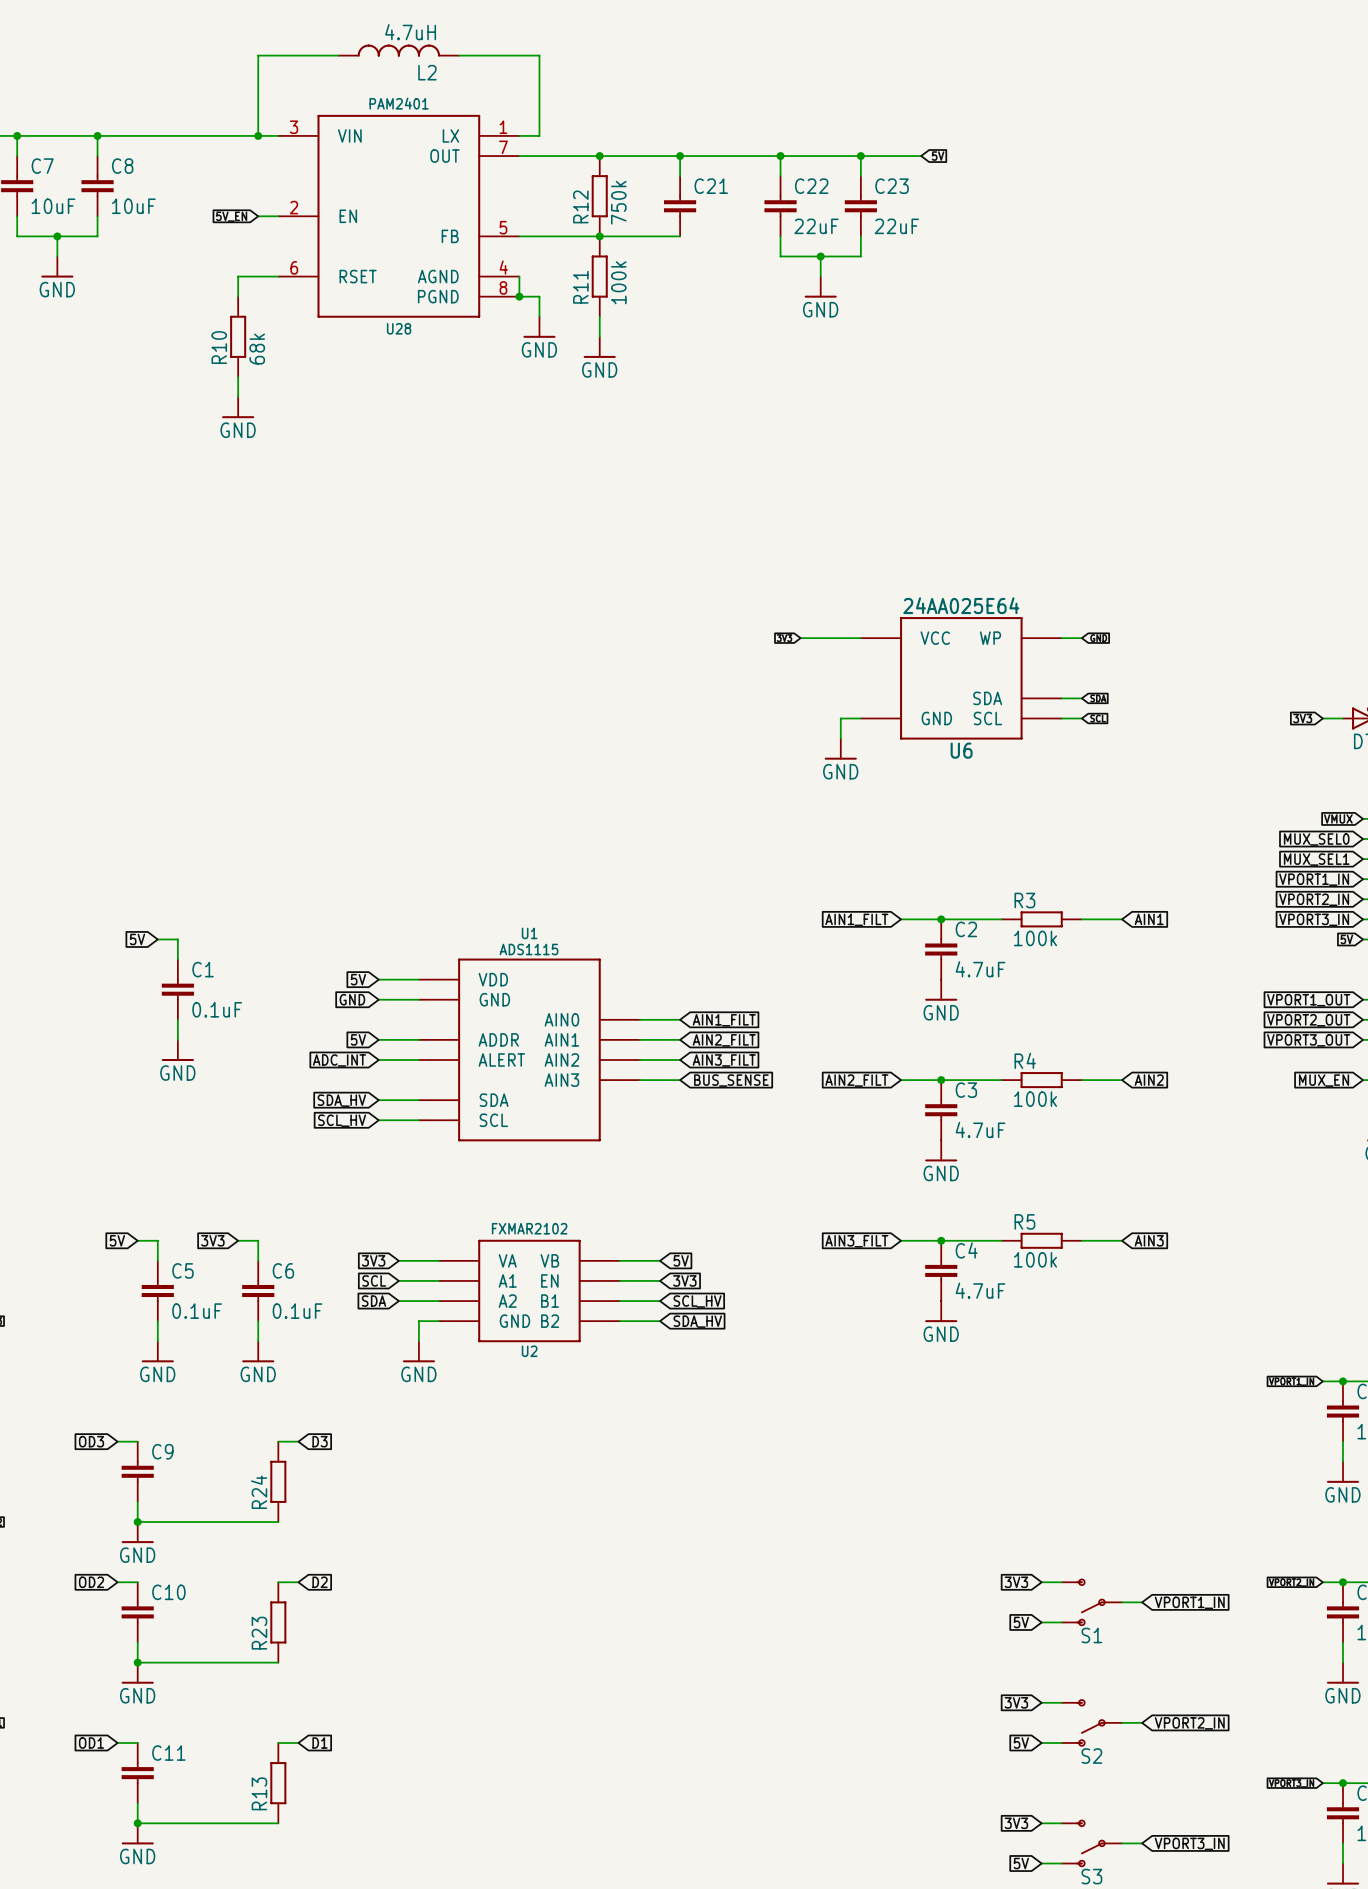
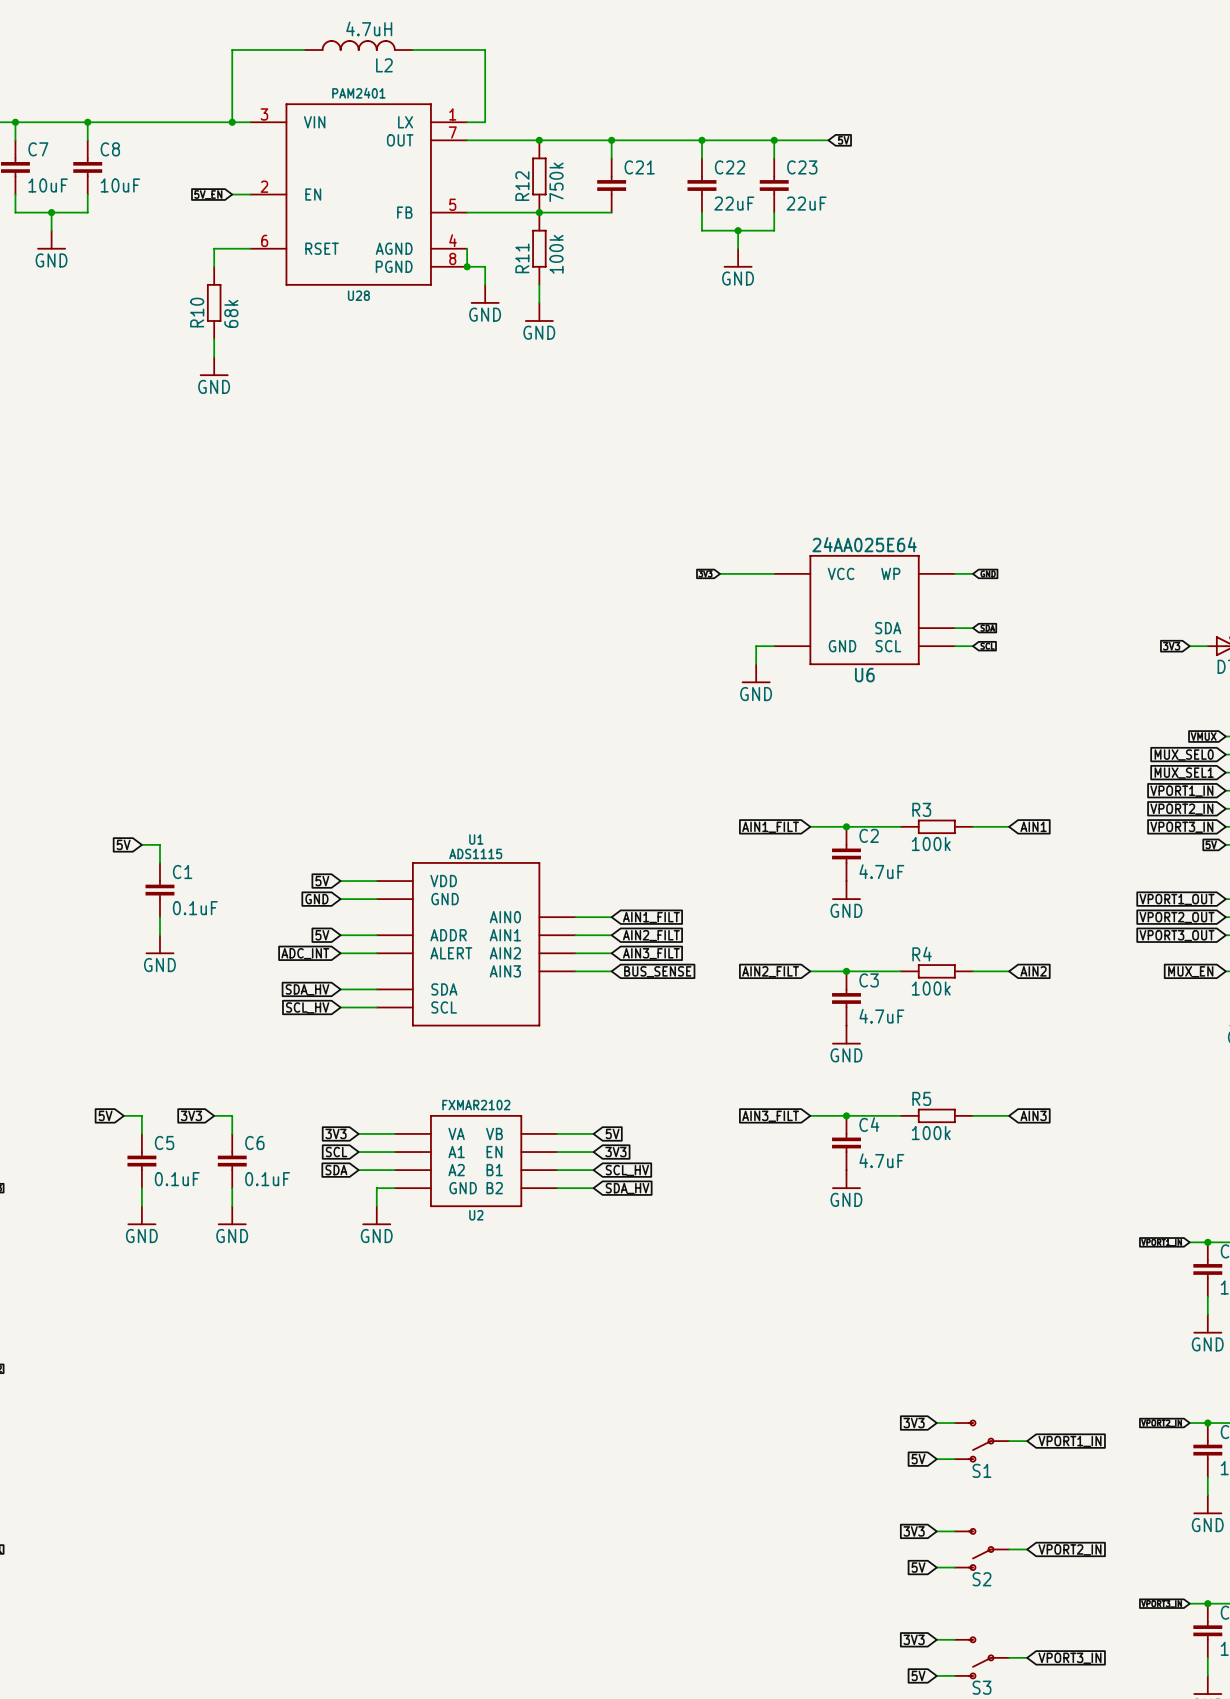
global label: OD3 (91, 1441) -> none
wire: (117, 1441) (137, 1441) -> none
wire: (278, 1441) (298, 1441) -> none
global label: D3 (320, 1441) -> none
C9: (137, 1471) -> none
R24: (278, 1481) -> none
wire: (137, 1501) (137, 1522) (278, 1522) -> none
junction: (137, 1522) -> none
power symbol: GND (137, 1532) -> none
global label: OD2 (91, 1582) -> none
wire: (117, 1582) (137, 1582) -> none
wire: (278, 1582) (298, 1582) -> none
global label: D2 (320, 1582) -> none
C10: (137, 1612) -> none
R23: (278, 1622) -> none
wire: (137, 1642) (137, 1662) (278, 1662) -> none
junction: (137, 1662) -> none
power symbol: GND (137, 1673) -> none
global label: OD1 (91, 1742) -> none
wire: (117, 1742) (137, 1742) -> none
wire: (278, 1742) (298, 1742) -> none
global label: D1 (320, 1742) -> none
C11: (137, 1773) -> none
R13: (278, 1783) -> none
wire: (137, 1803) (137, 1823) (278, 1823) -> none
junction: (137, 1823) -> none
power symbol: GND (137, 1833) -> none

